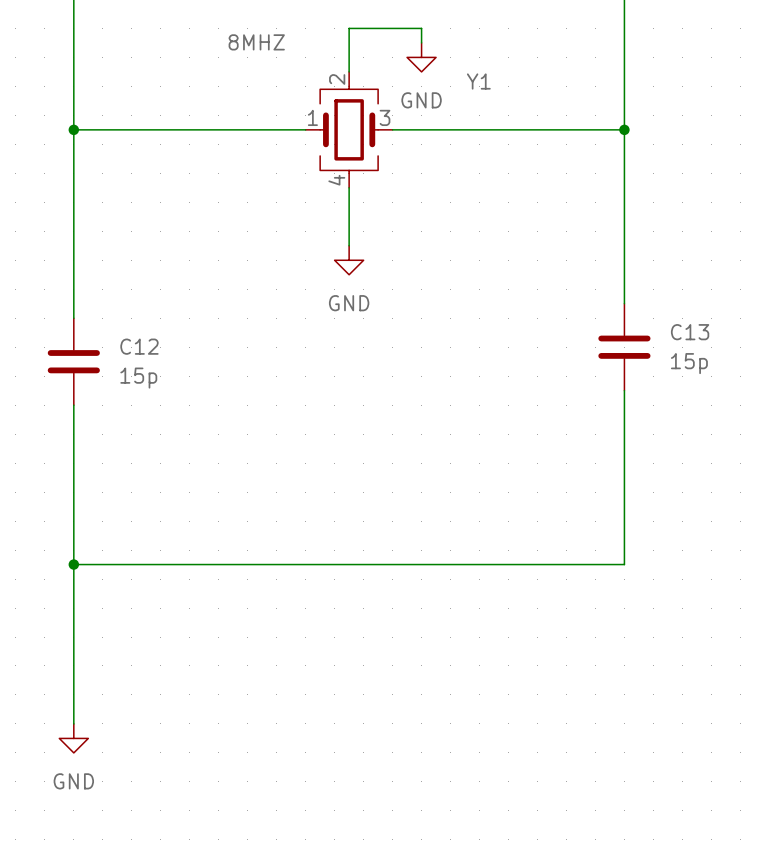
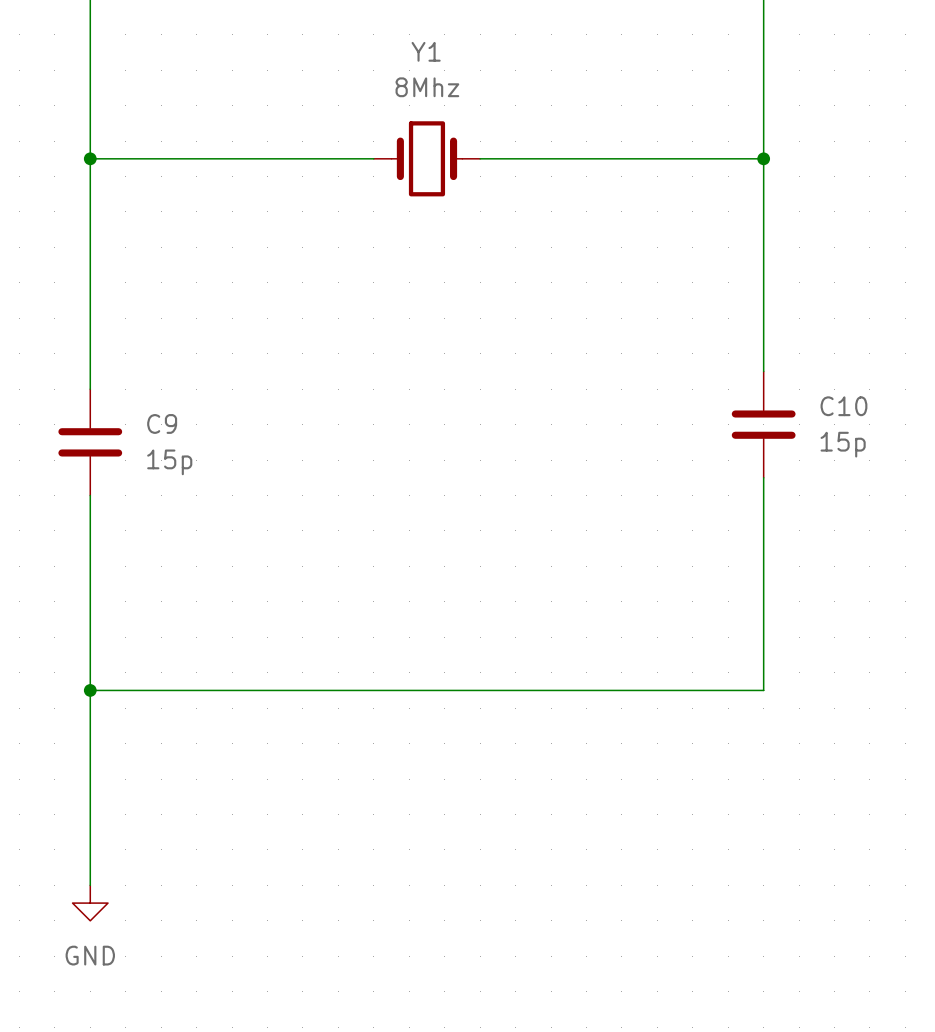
Y1 value: 8MHZ (256, 42) -> 8Mhz (427, 87)
wire: (421, 42) (421, 28) (349, 28) (349, 71) -> none
power symbol: GND (421, 57) -> none
Y1 symbol: [305, 71, 393, 188] -> [373, 121, 481, 197]
Y1 name position: Y1 (478, 81) -> Y1 (426, 51)
wire: (349, 187) (349, 245) -> none
power symbol: GND (349, 260) -> none
C13 name: C13 (690, 332) -> C10 (843, 406)
C12 name: C12 (139, 346) -> C9 (162, 423)

